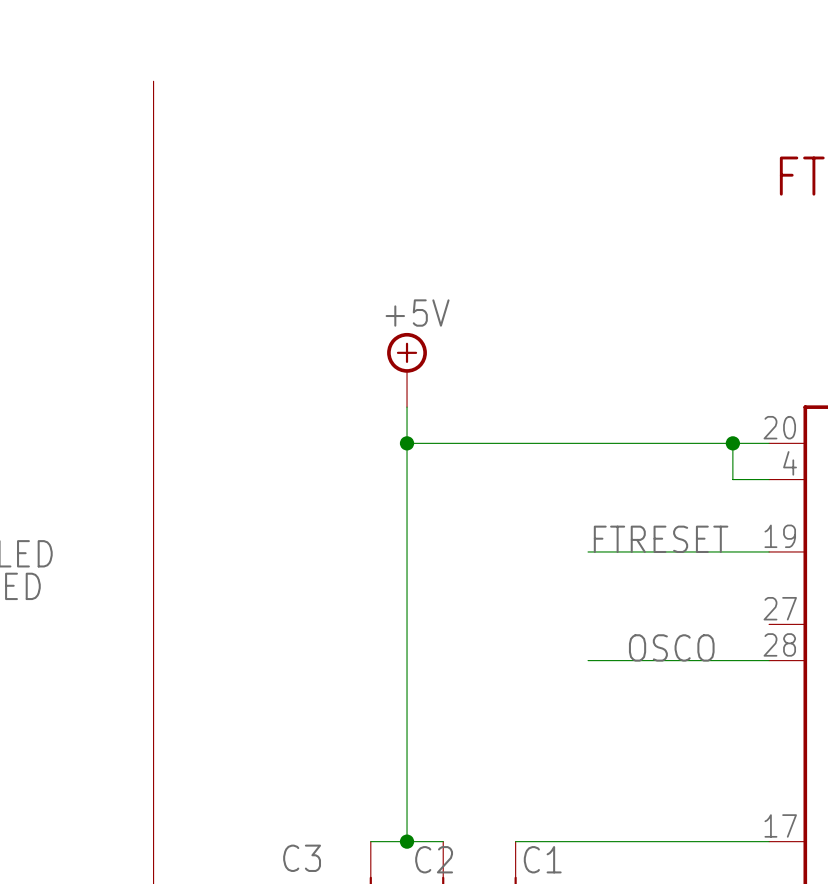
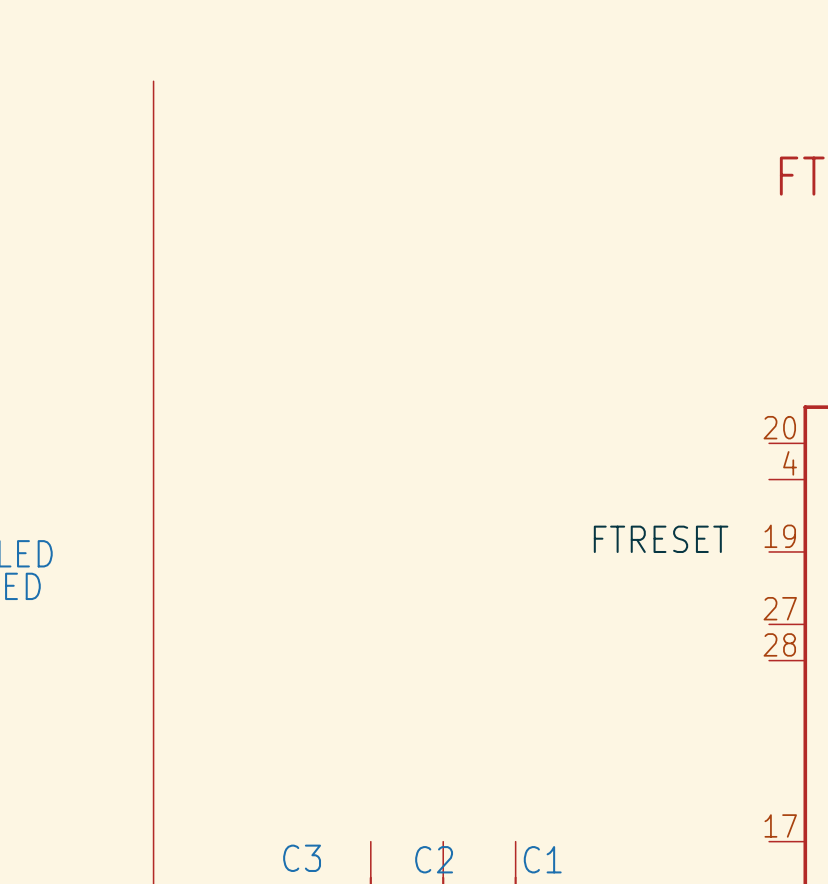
power symbol: +5V (407, 370) -> none
wire: (407, 407) (407, 841) -> none
wire: (407, 443) (769, 443) -> none
junction: (407, 443) -> none
wire: (732, 443) (732, 479) (769, 479) -> none
junction: (732, 443) -> none
wire: (588, 551) (769, 551) -> none
label: OSCO (671, 647) -> none
wire: (588, 660) (769, 660) -> none
wire: (370, 841) (443, 841) -> none
junction: (407, 841) -> none
wire: (515, 841) (769, 841) -> none

